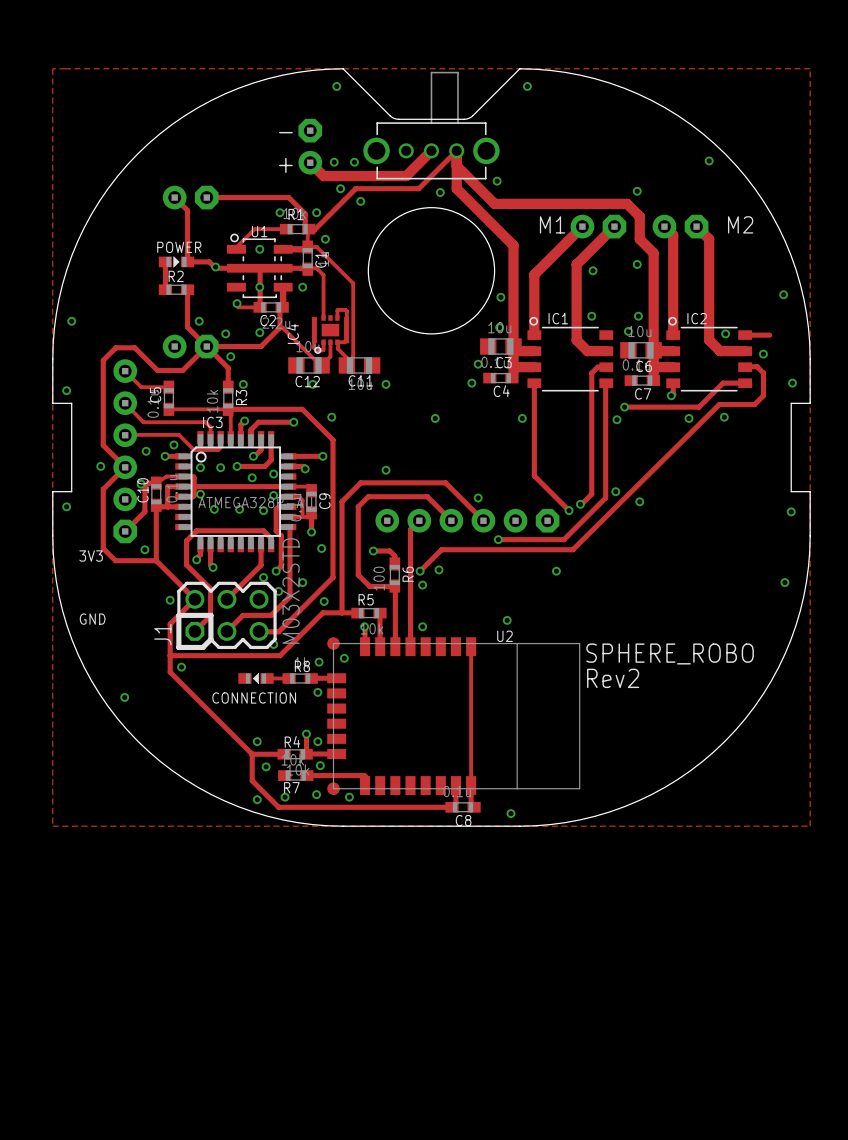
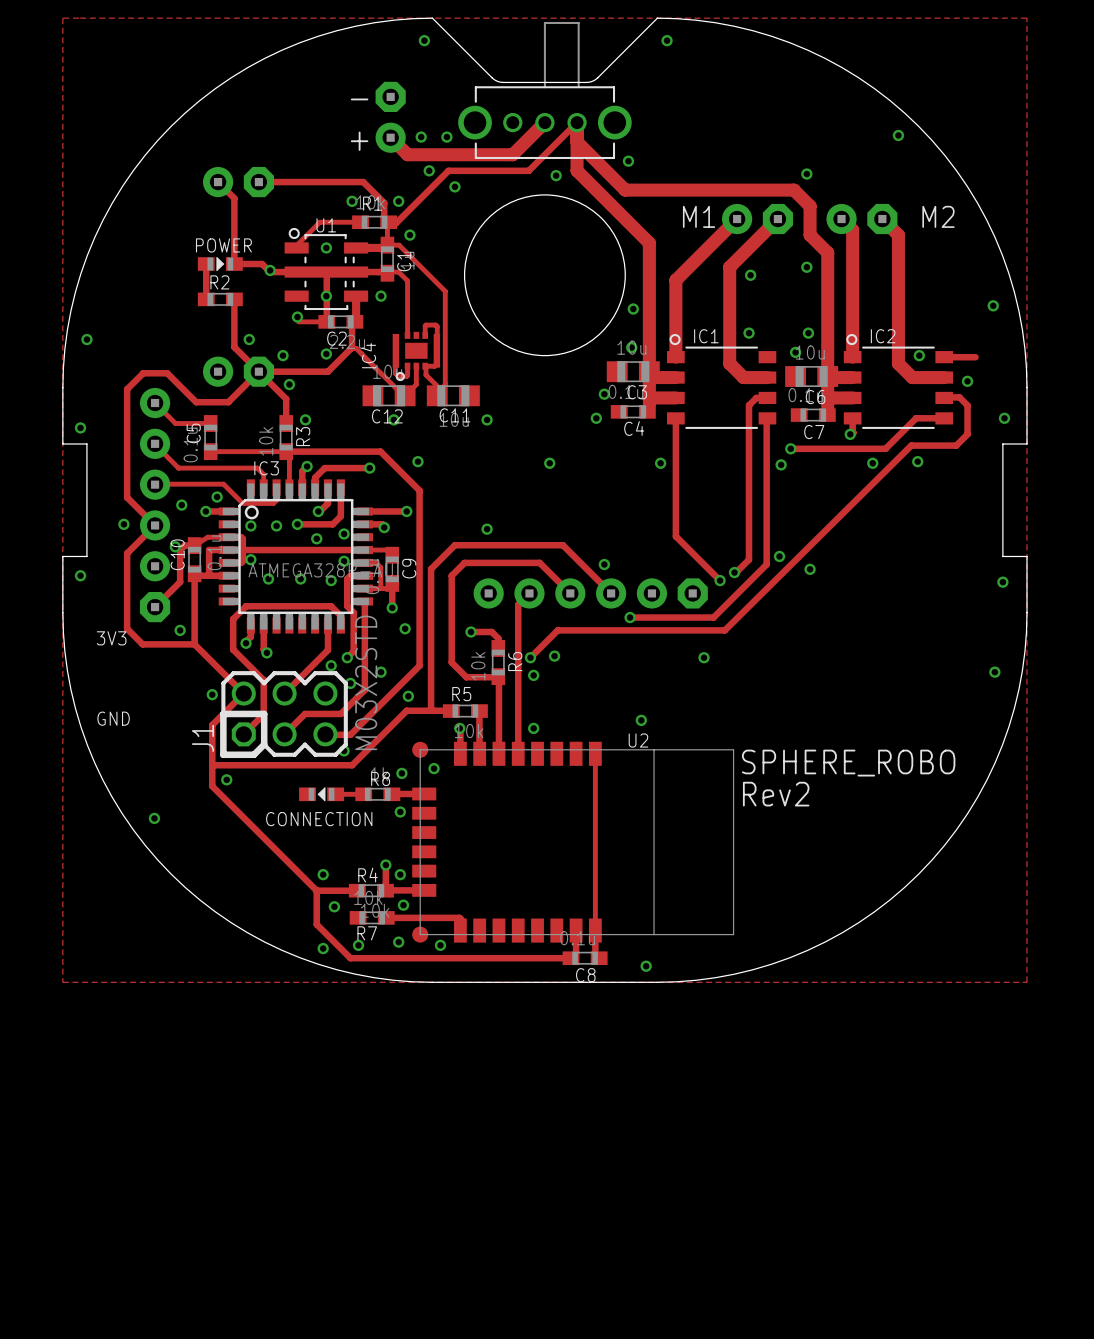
R6 value: 100 (379, 578) -> 10k (478, 666)

